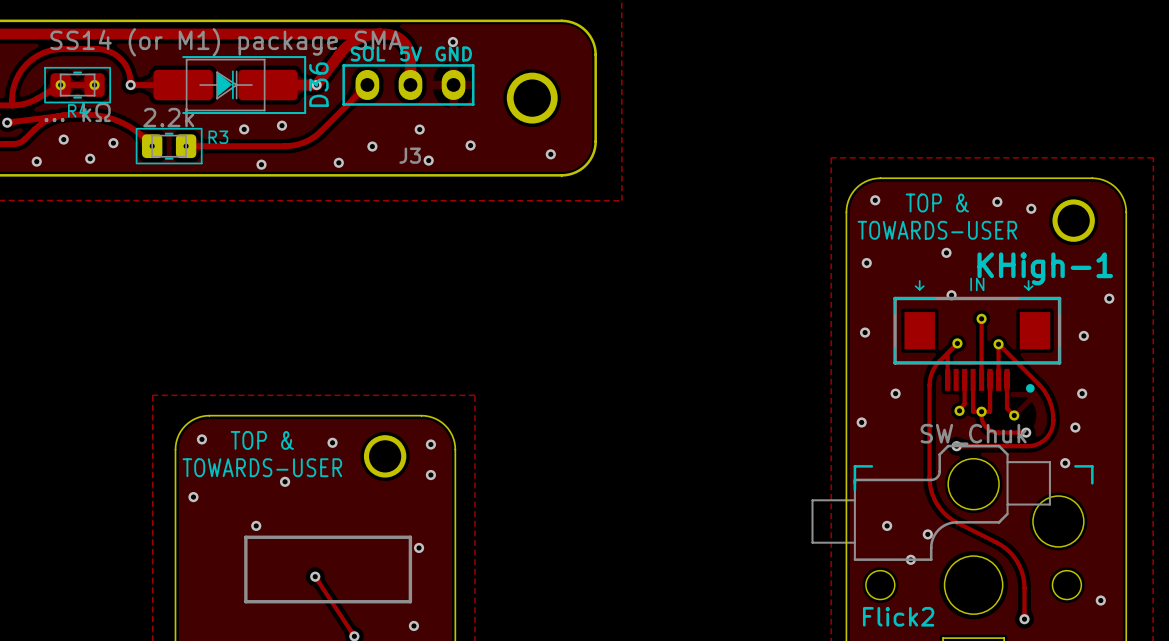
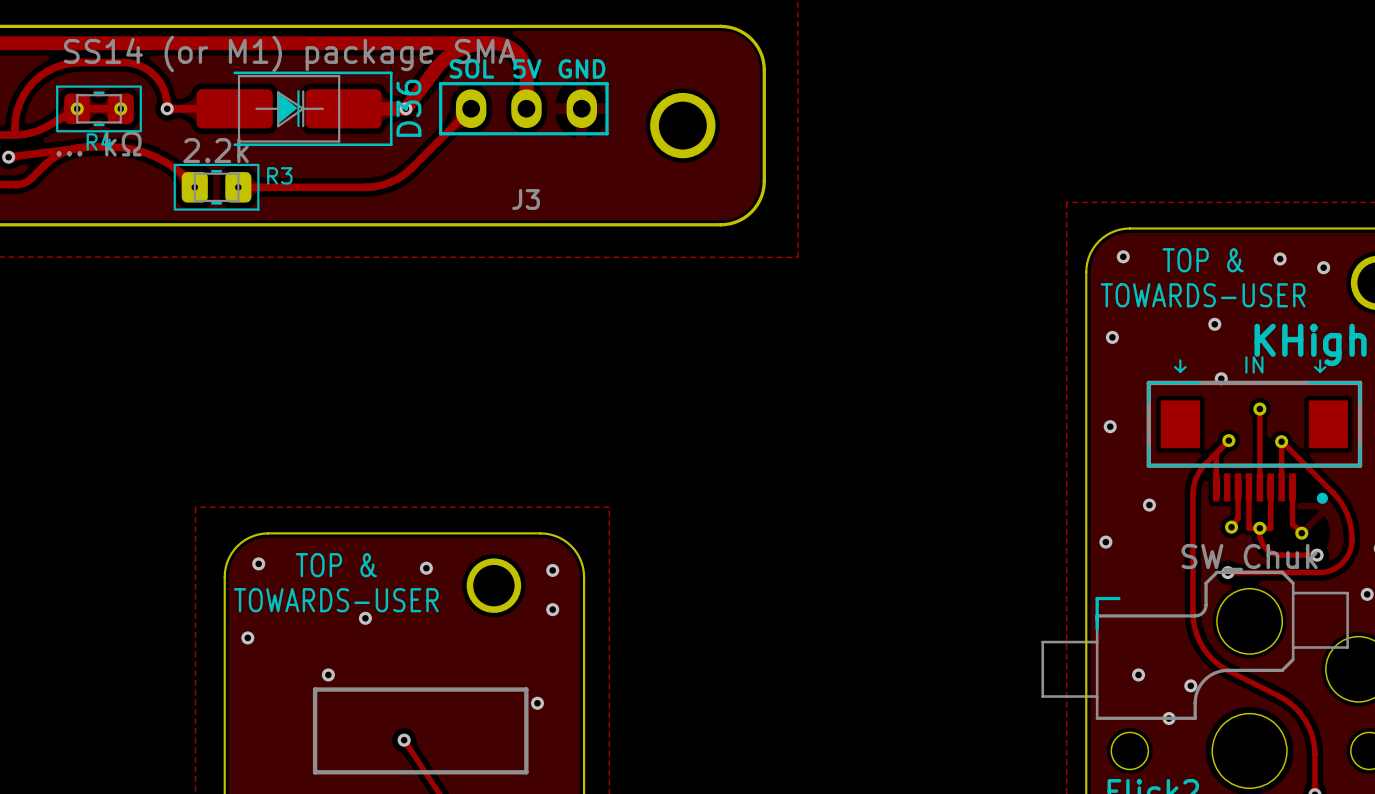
via: (452, 42) -> none
via: (282, 125) -> none
via: (244, 129) -> none
via: (419, 129) -> none
via: (63, 139) -> none
via: (113, 143) -> none
via: (470, 145) -> none
via: (372, 146) -> none
via: (550, 154) -> none
via: (90, 158) -> none
via: (428, 160) -> none
via: (36, 161) -> none
via: (338, 162) -> none
via: (261, 164) -> none

